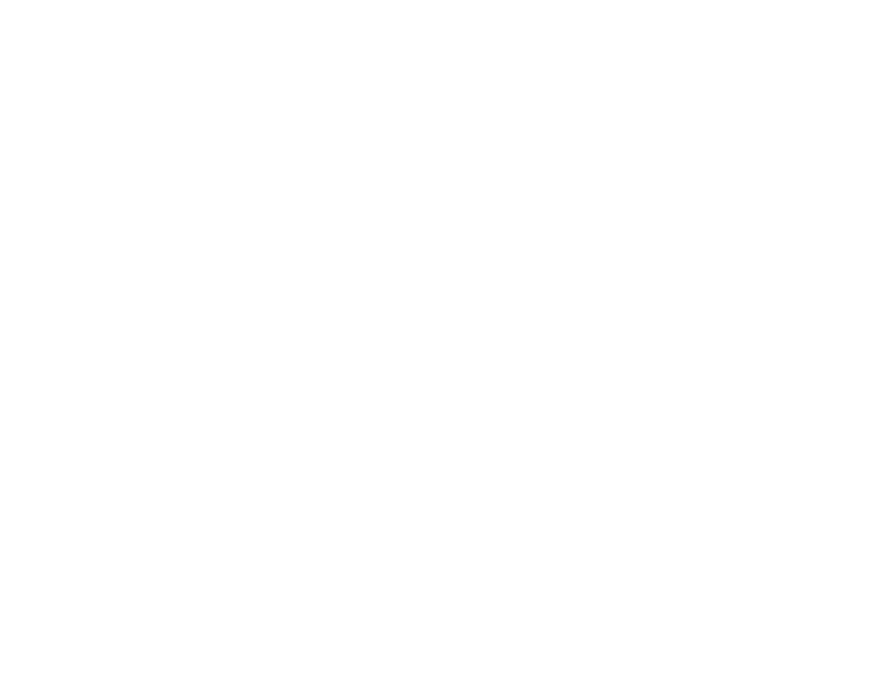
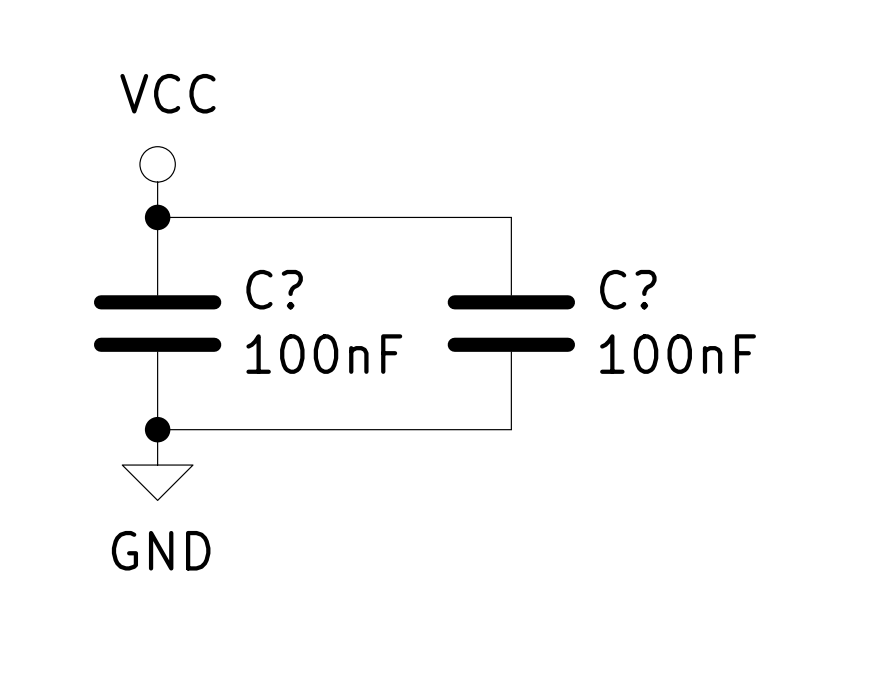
power symbol: none -> VCC (157, 182)
wire: none -> (157, 217) (511, 217)
junction: none -> (157, 217)
C?: none -> 100nF (157, 323)
C?: none -> 100nF (511, 323)
wire: none -> (157, 429) (511, 429)
junction: none -> (157, 429)
power symbol: none -> GND (157, 465)

